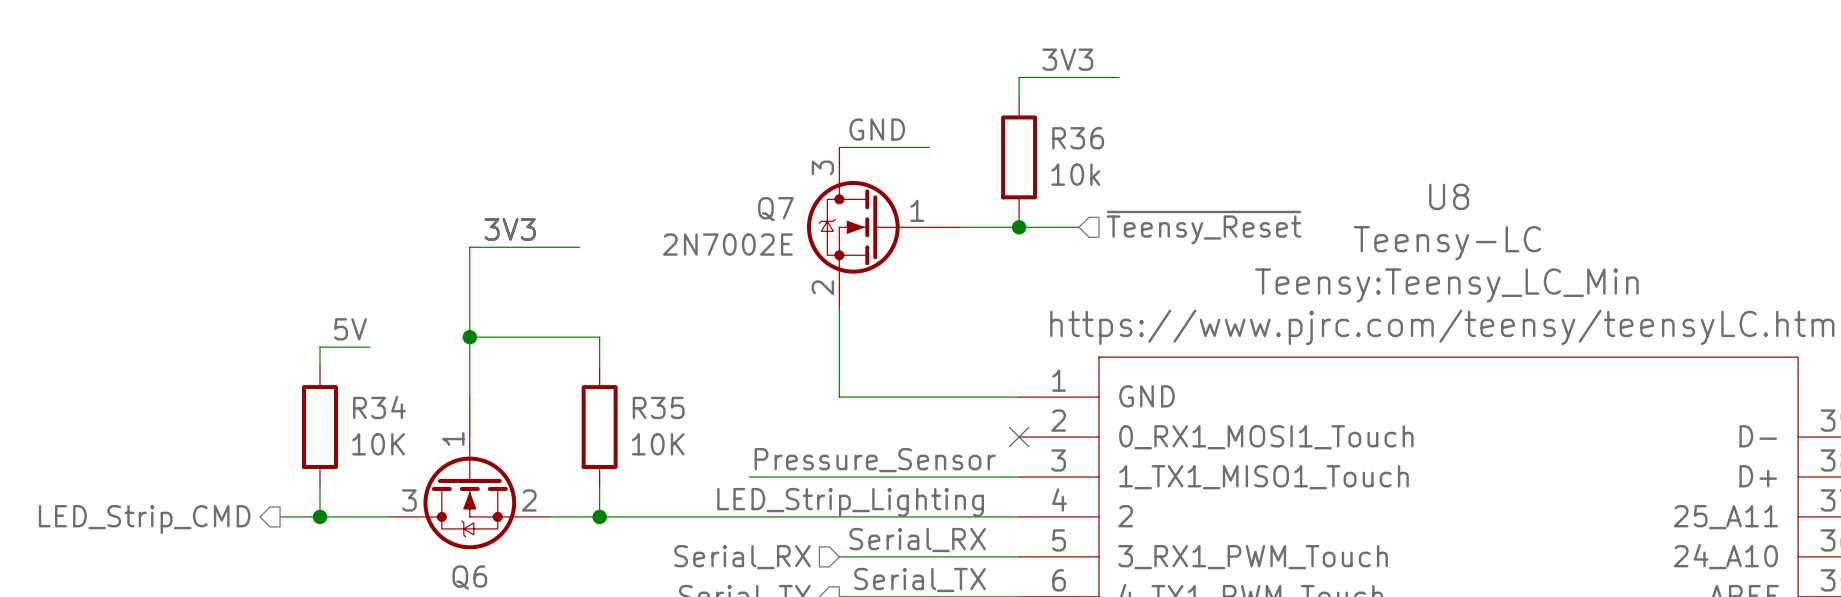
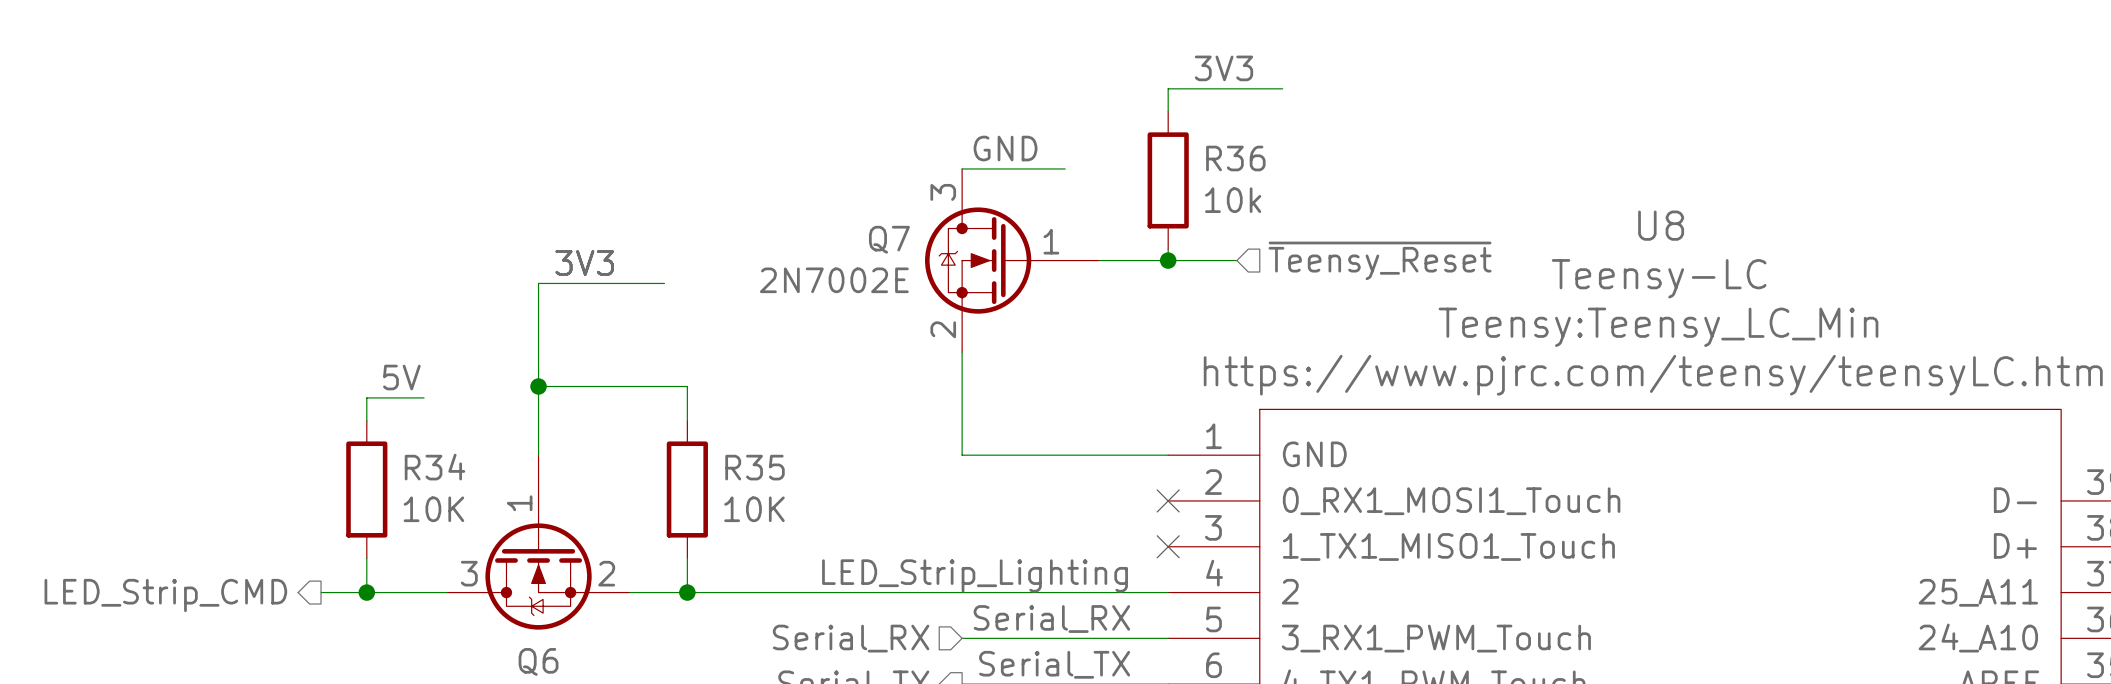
label: Pressure_Sensor (875, 460) -> none
wire: (749, 476) (1019, 476) -> none
no-connect mark: none -> (1168, 546)

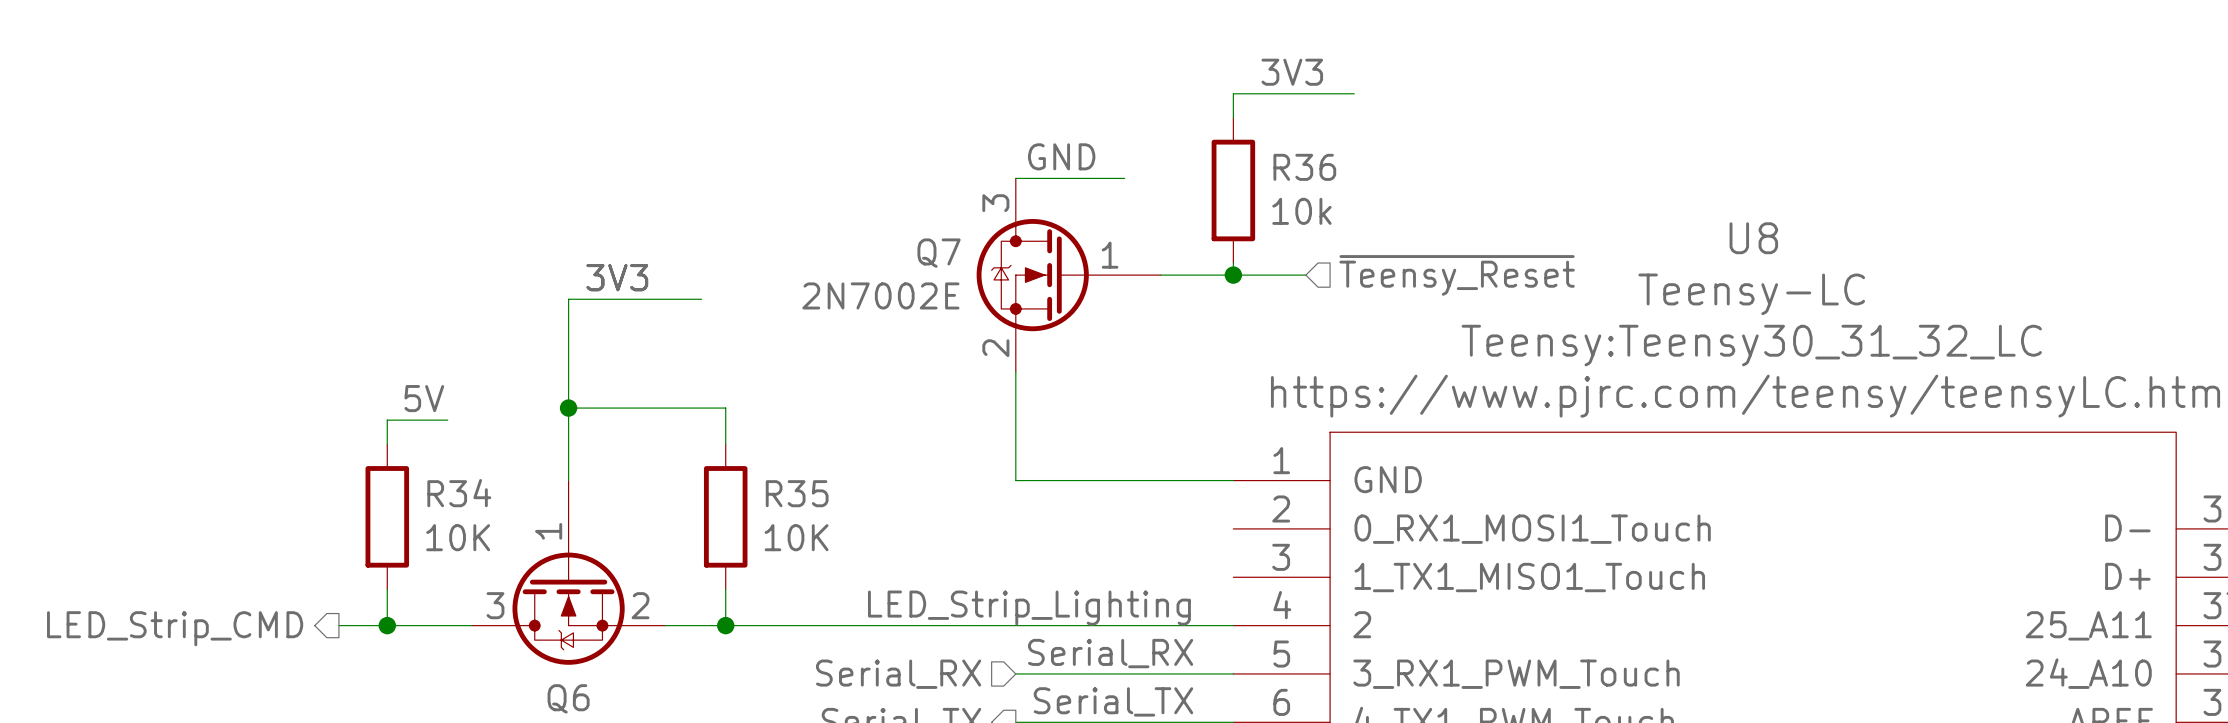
U8 text: Teensy:Teensy_LC_Min (1658, 327) -> Teensy:Teensy30_31_32_LC (1751, 345)
no-connect mark: (1168, 500) -> none
no-connect mark: (1168, 546) -> none

